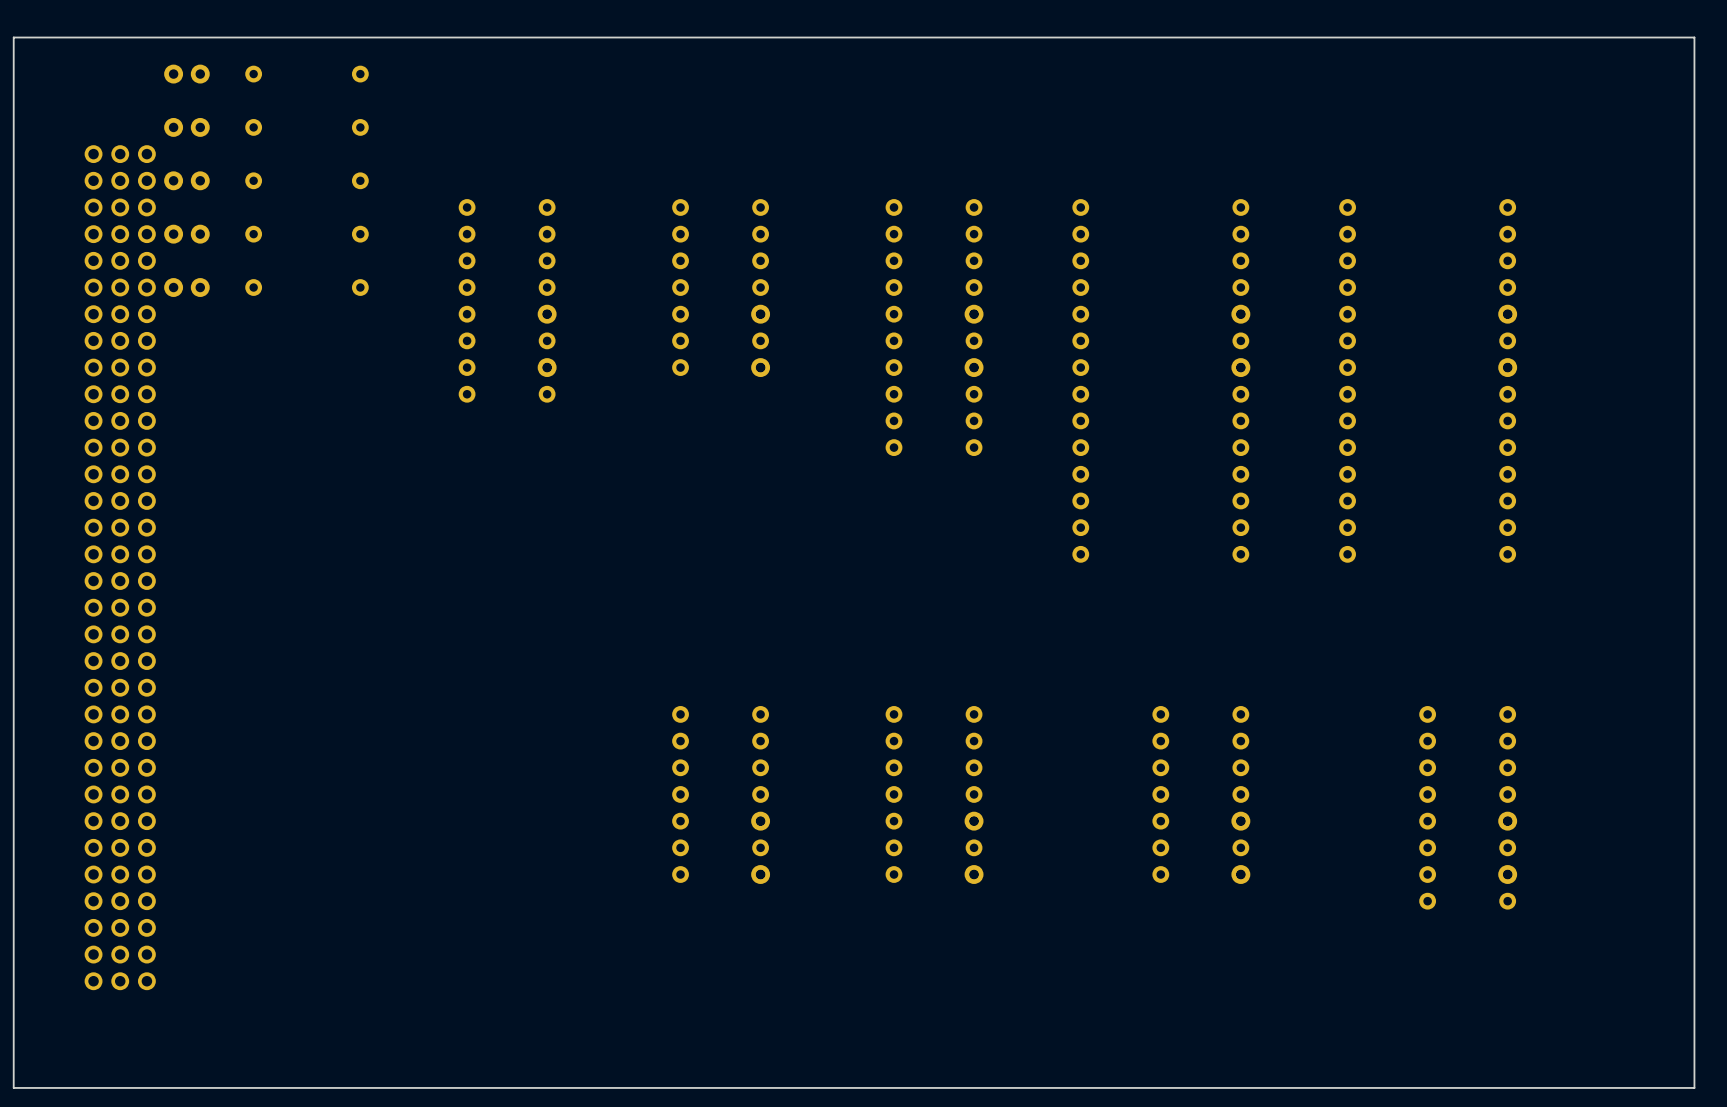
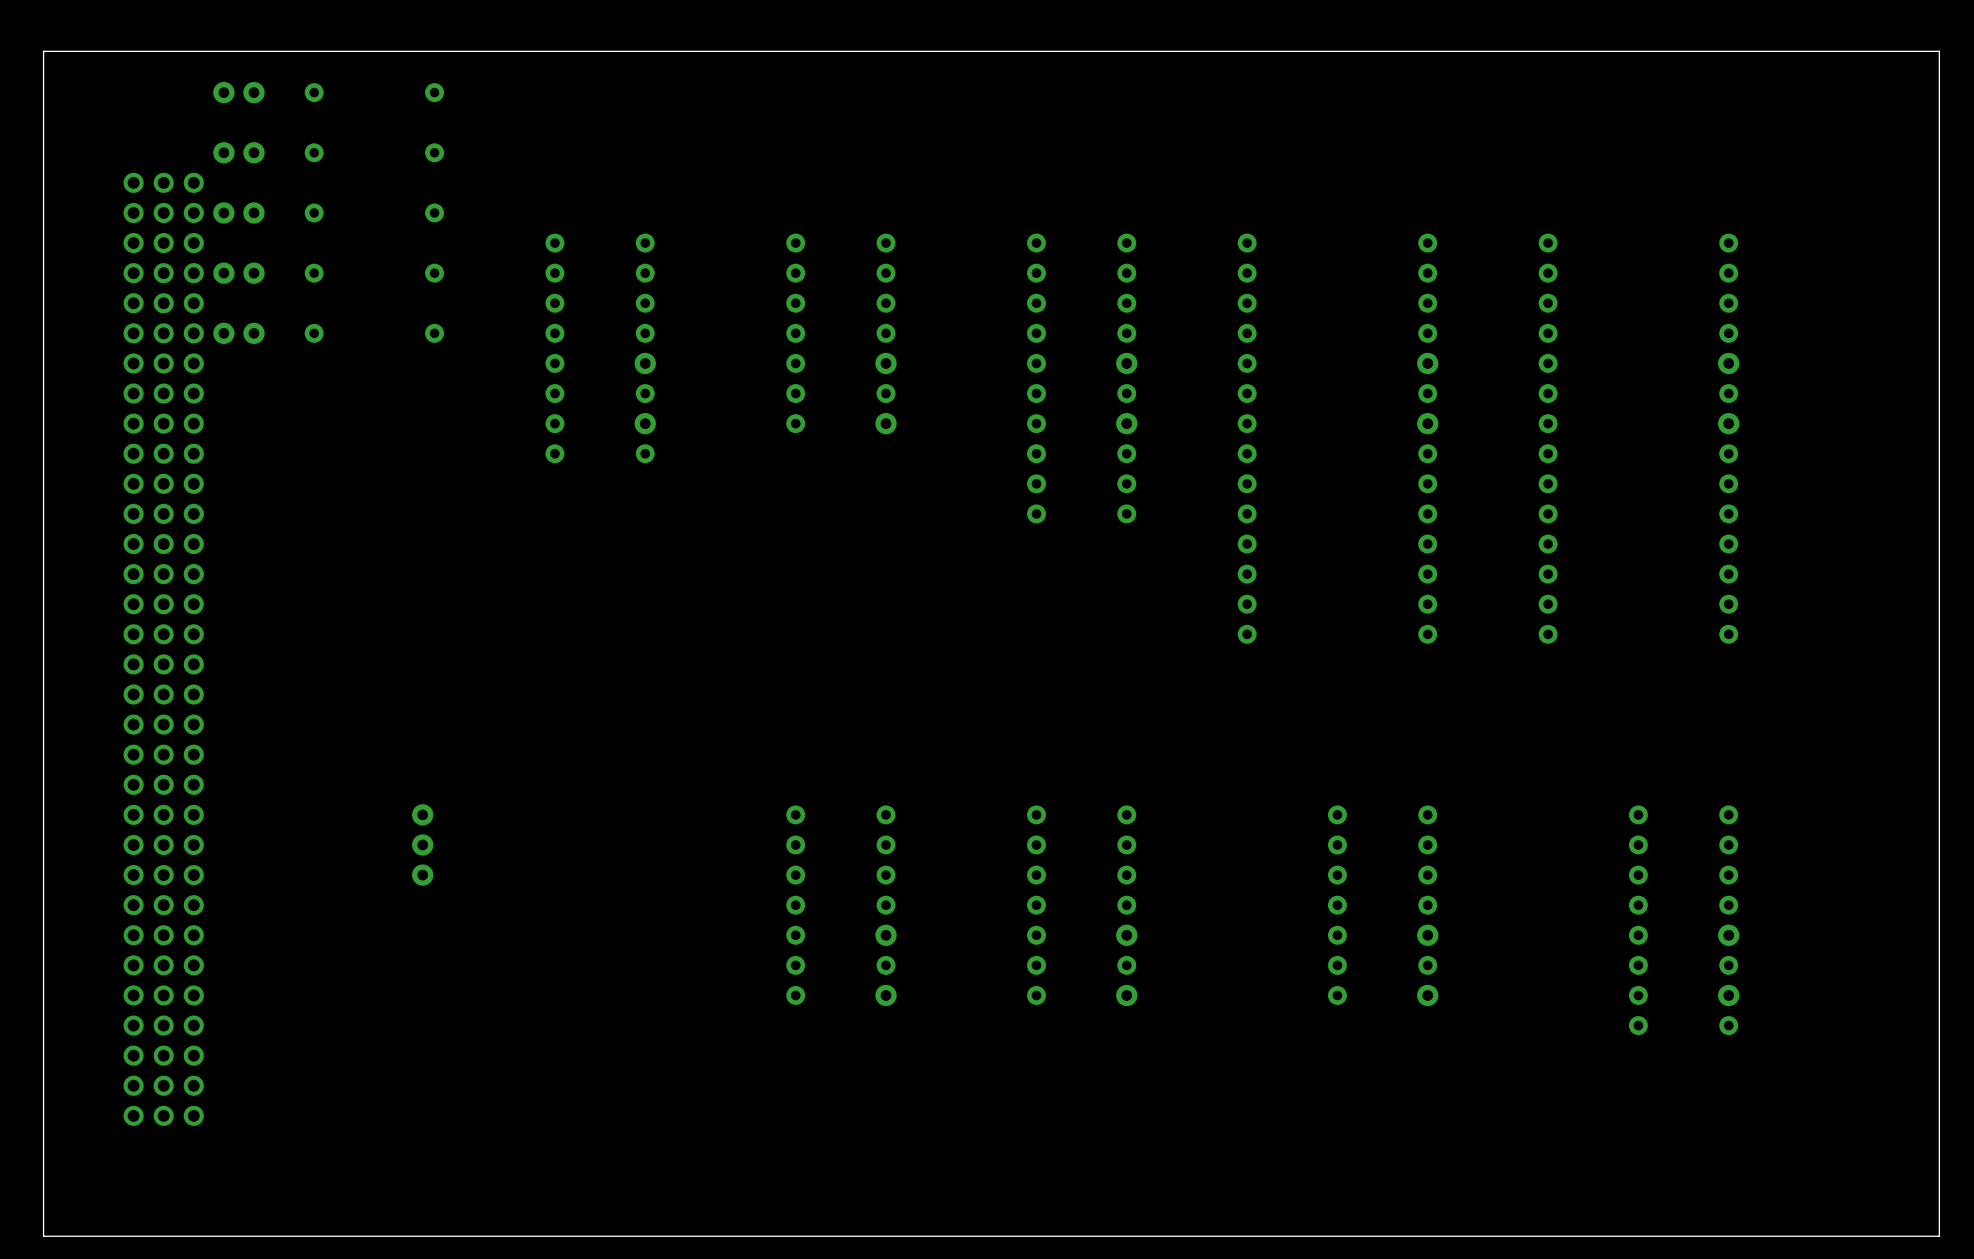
part: none -> (422, 844)

